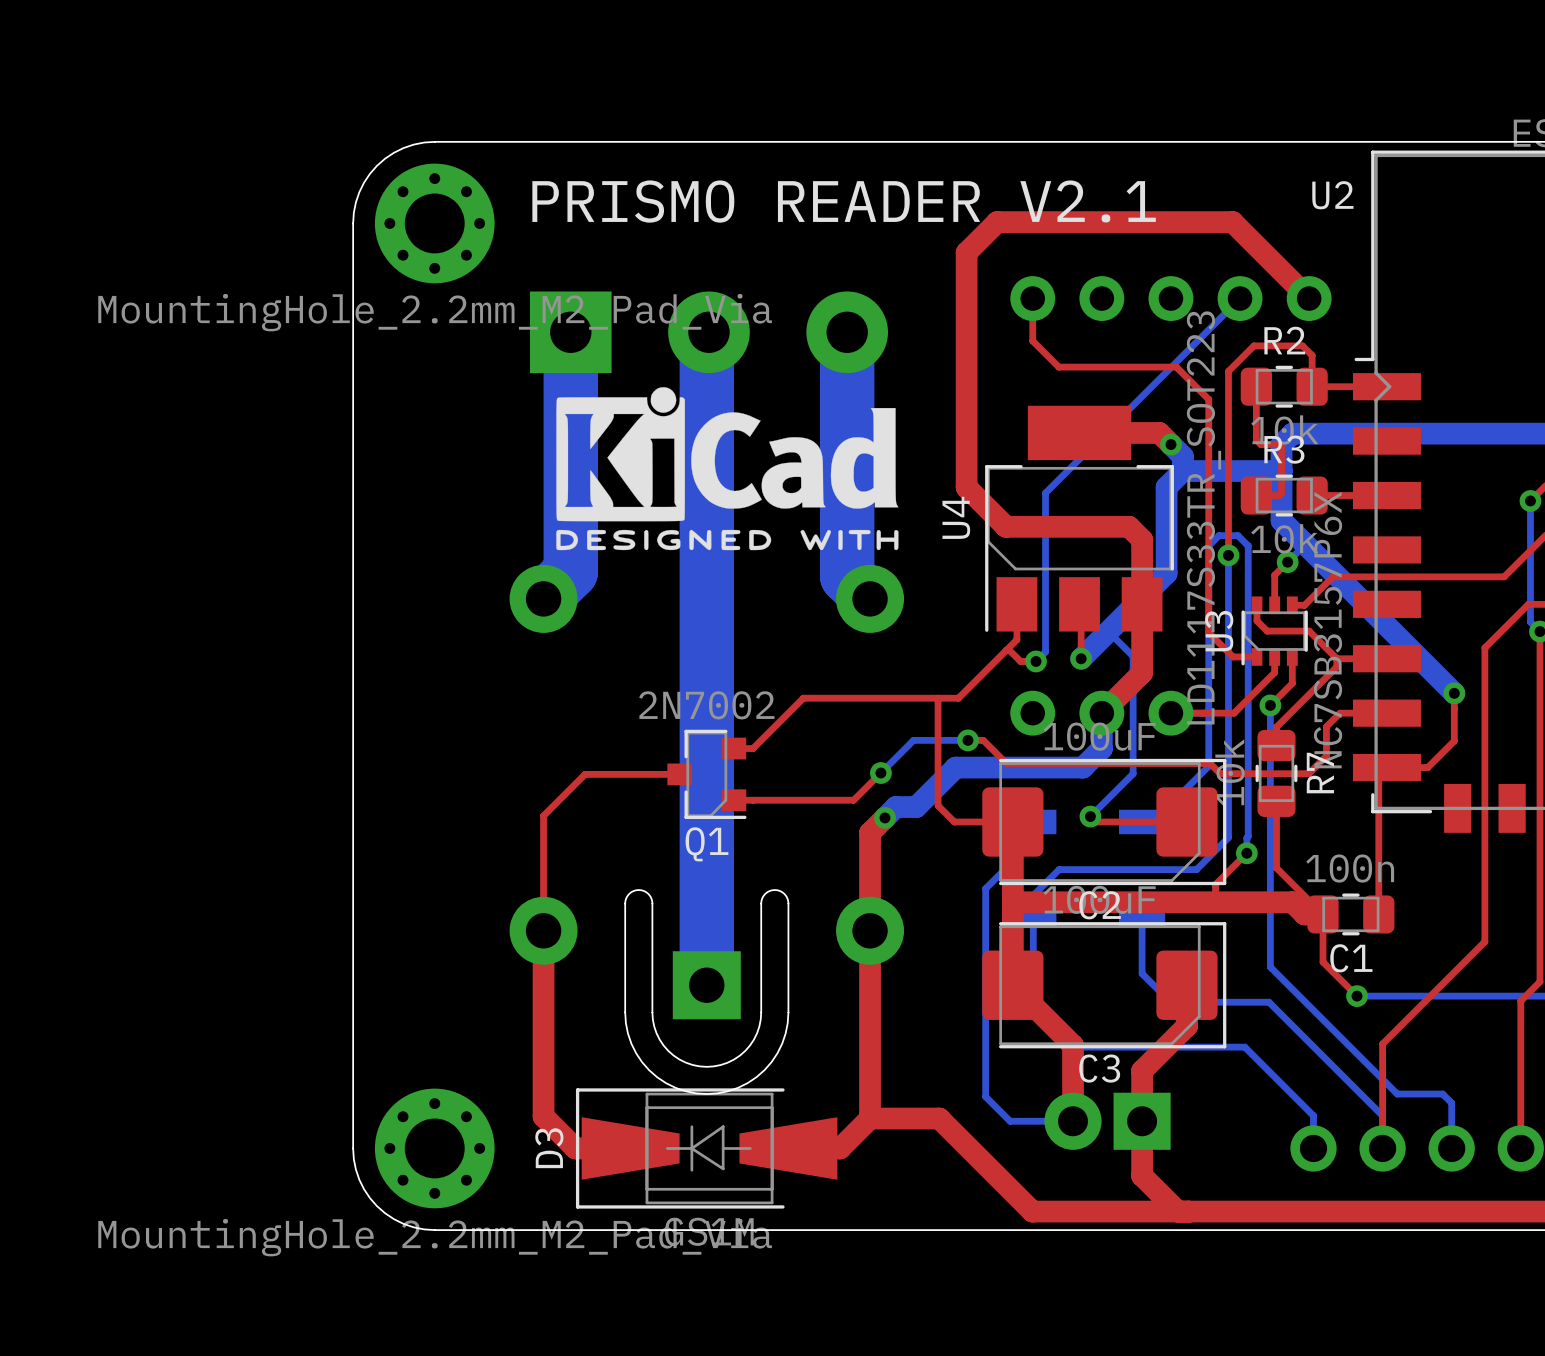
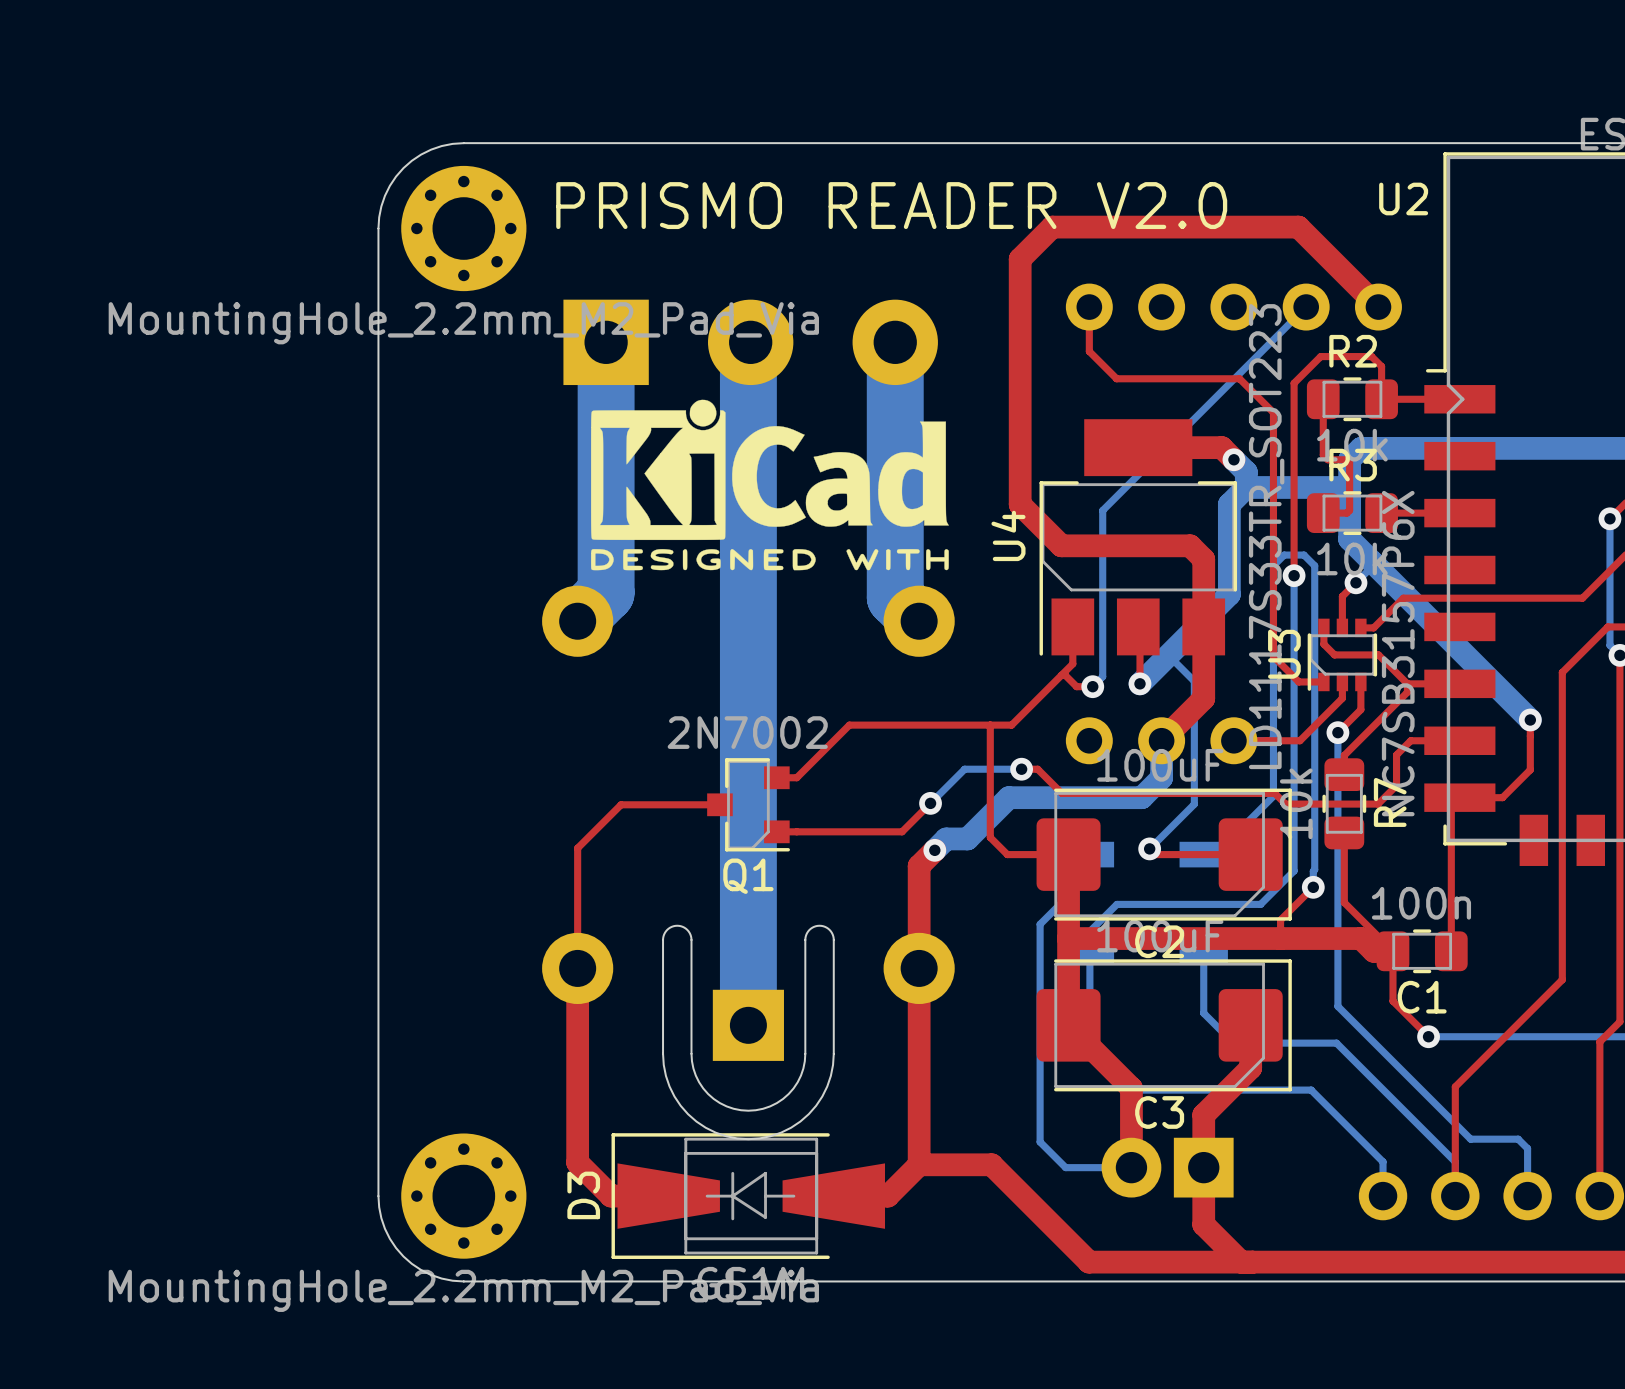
text: PRISMO READER V2.1 (844, 201) -> PRISMO READER V2.0 (891, 205)

